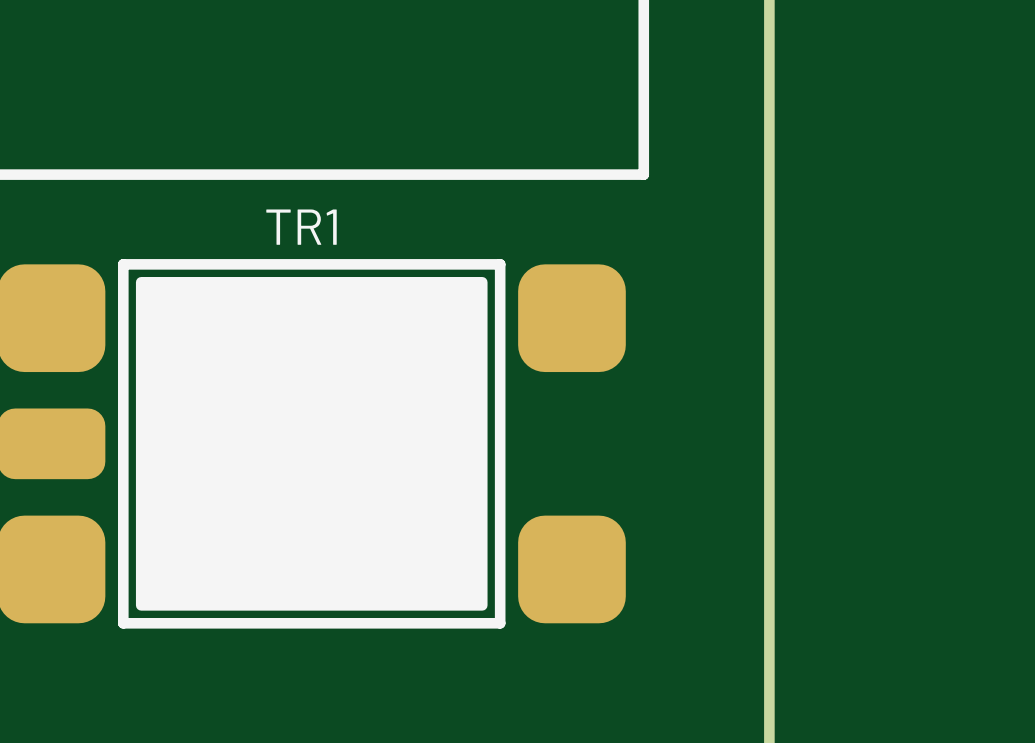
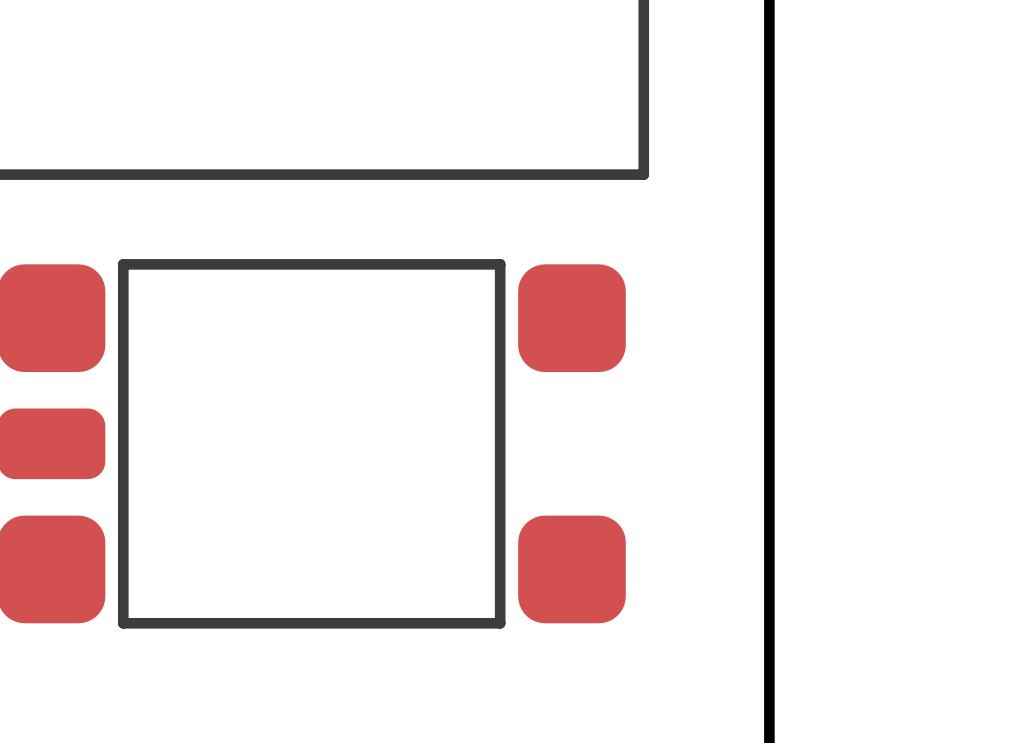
TR1 name: TR1 (301, 227) -> none
drawing: [135, 277, 488, 611] -> none

